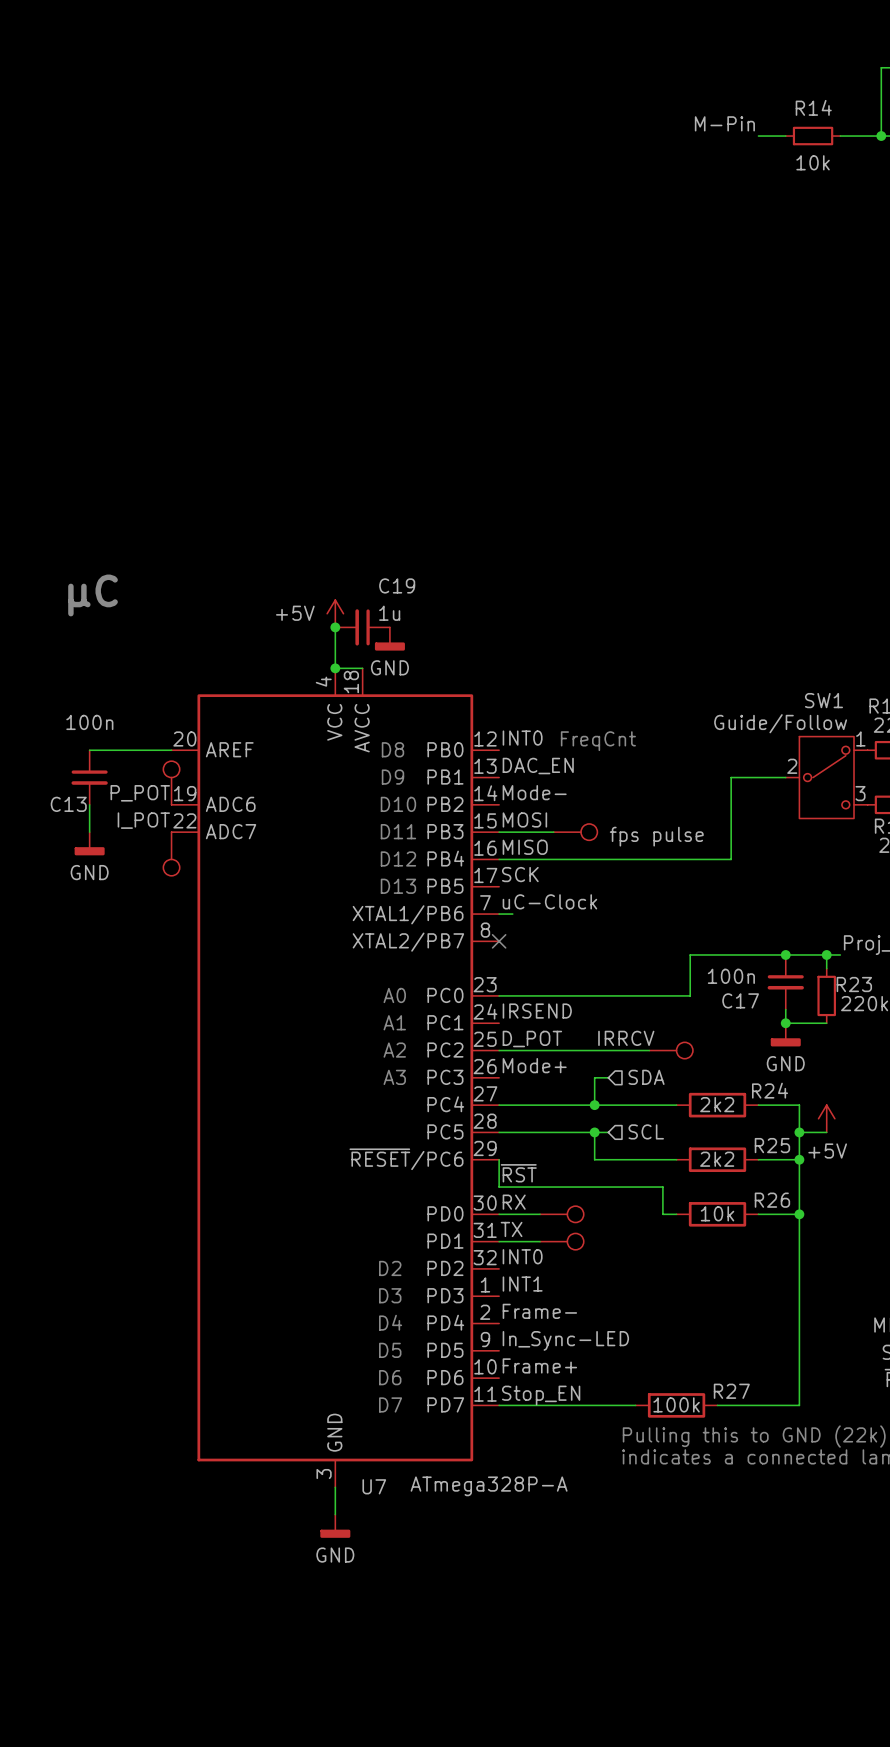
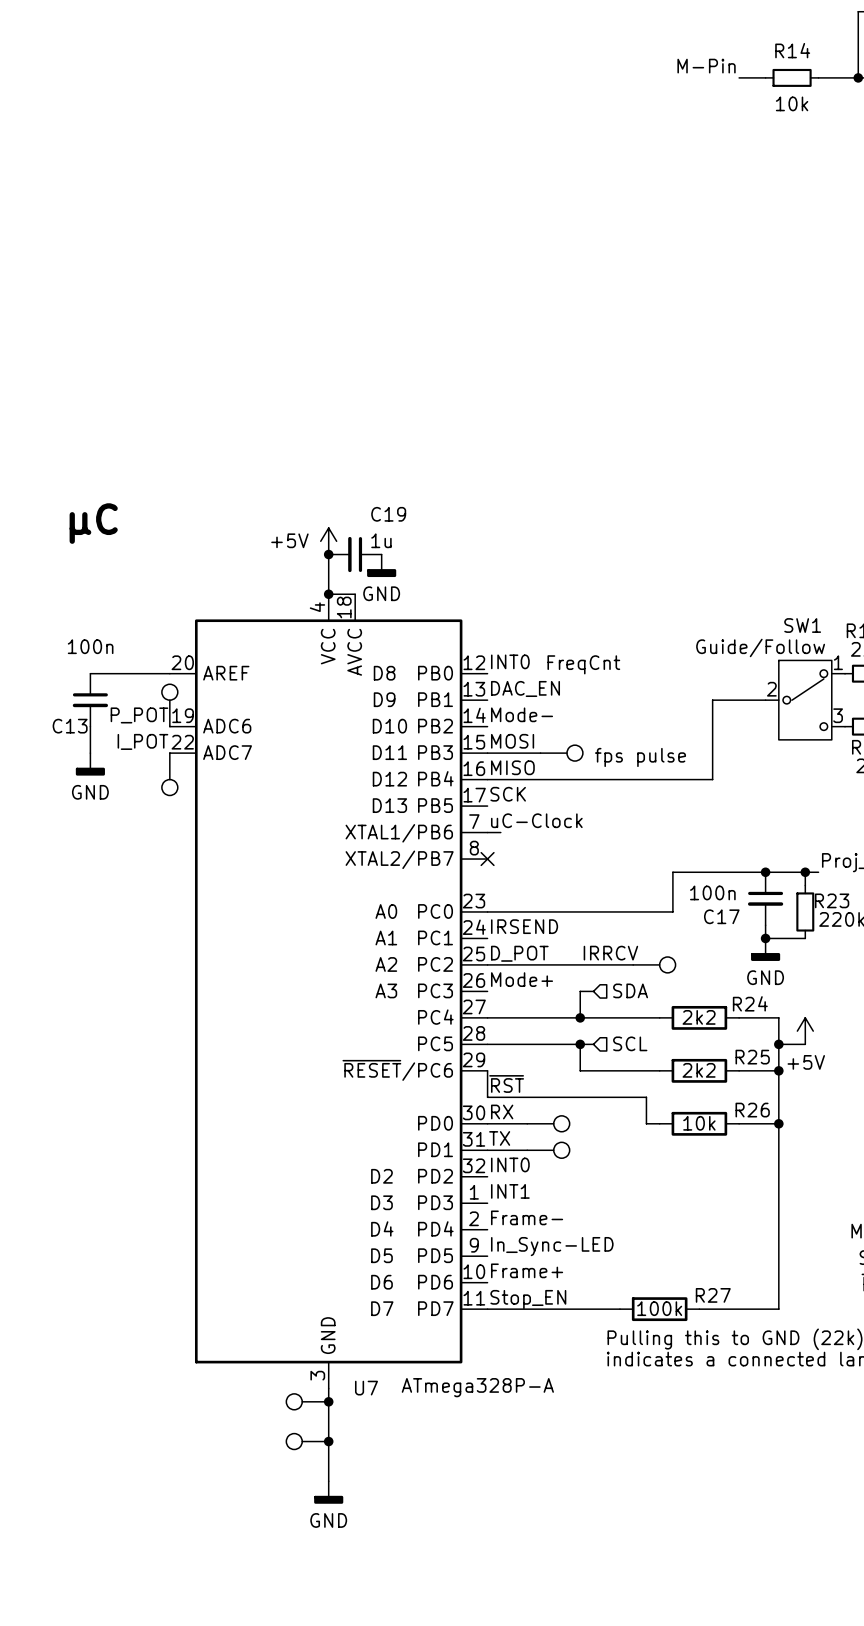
part: none -> (307, 1401)
junction: none -> (328, 1401)
wire: none -> (328, 1415) (328, 1481)
power symbol position: GND (335, 1526) -> GND (328, 1492)
part: none -> (307, 1441)
junction: none -> (328, 1441)

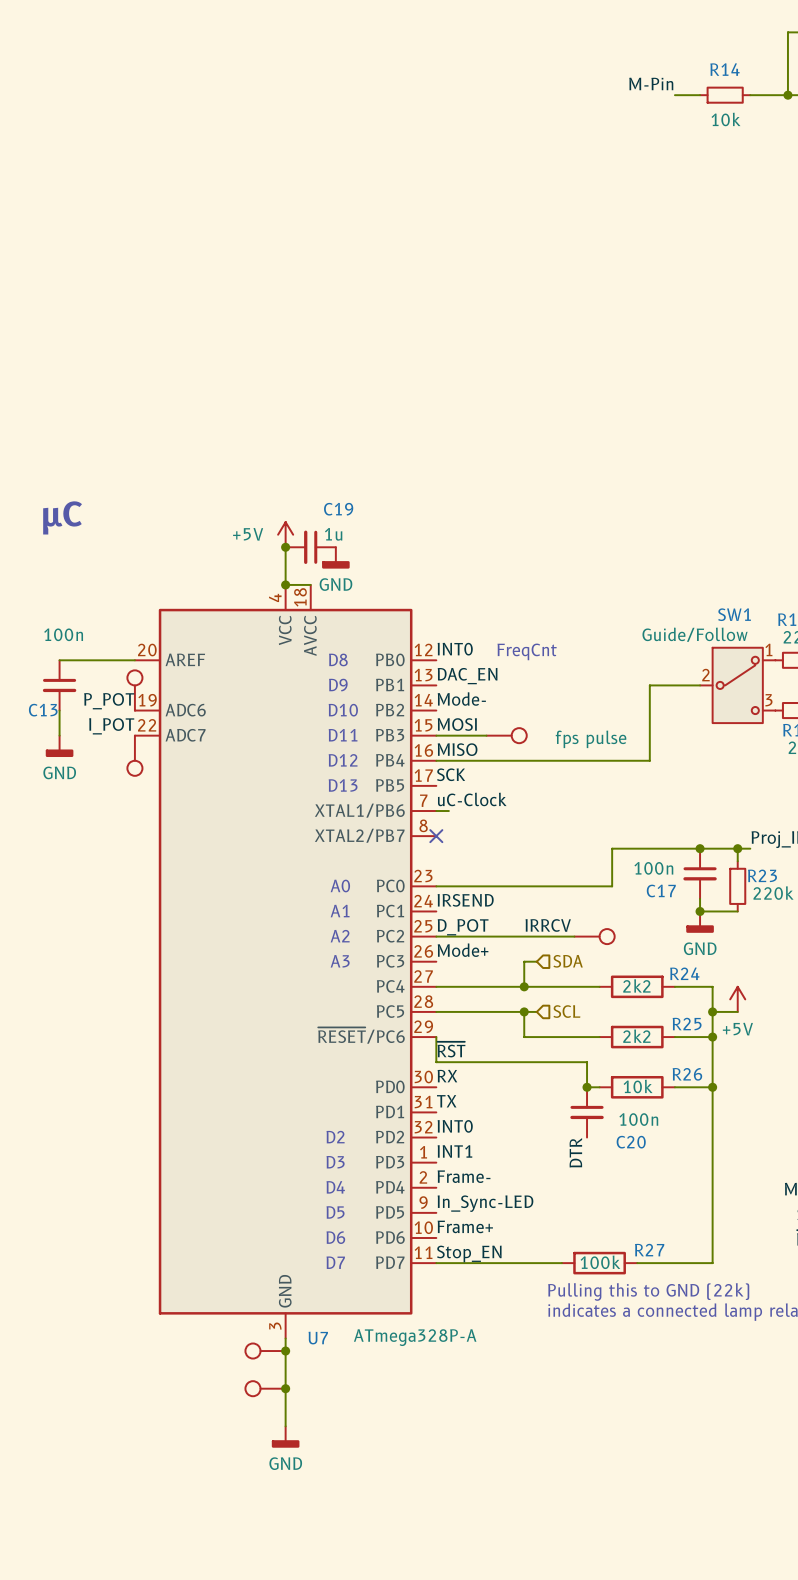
wire: (487, 1123) (527, 1123) -> none
part: (548, 1123) -> none
junction: none -> (587, 1087)
wire: (487, 1150) (527, 1150) -> none
part: (548, 1150) -> none
C20: none -> 100n (587, 1112)
label: none -> DTR (575, 1152)

